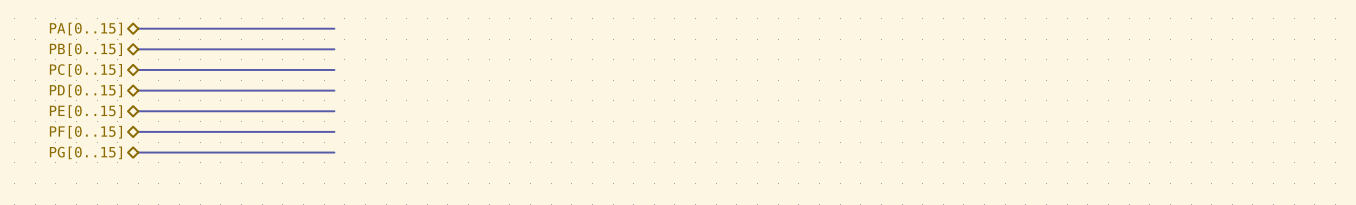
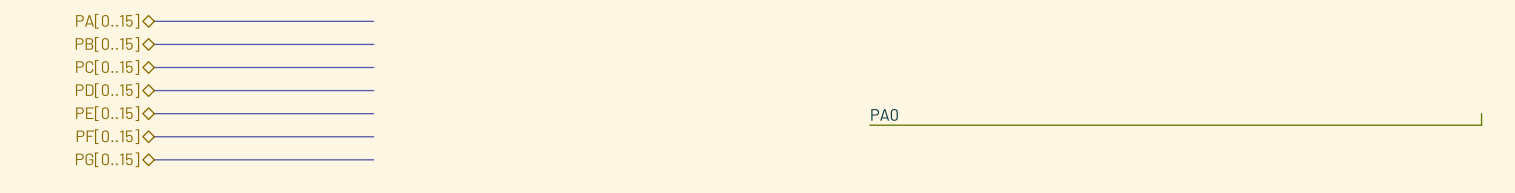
wire: none -> (1481, 113) (1481, 125) (869, 125)
label: none -> PA0 (884, 114)

